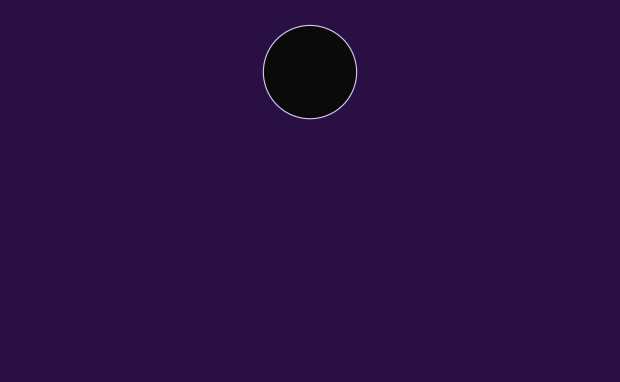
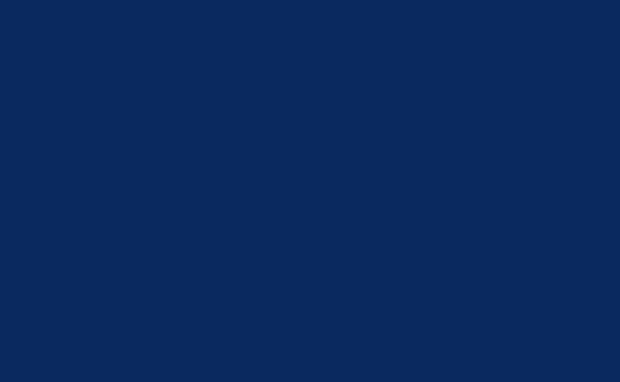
part: (309, 72) -> none

